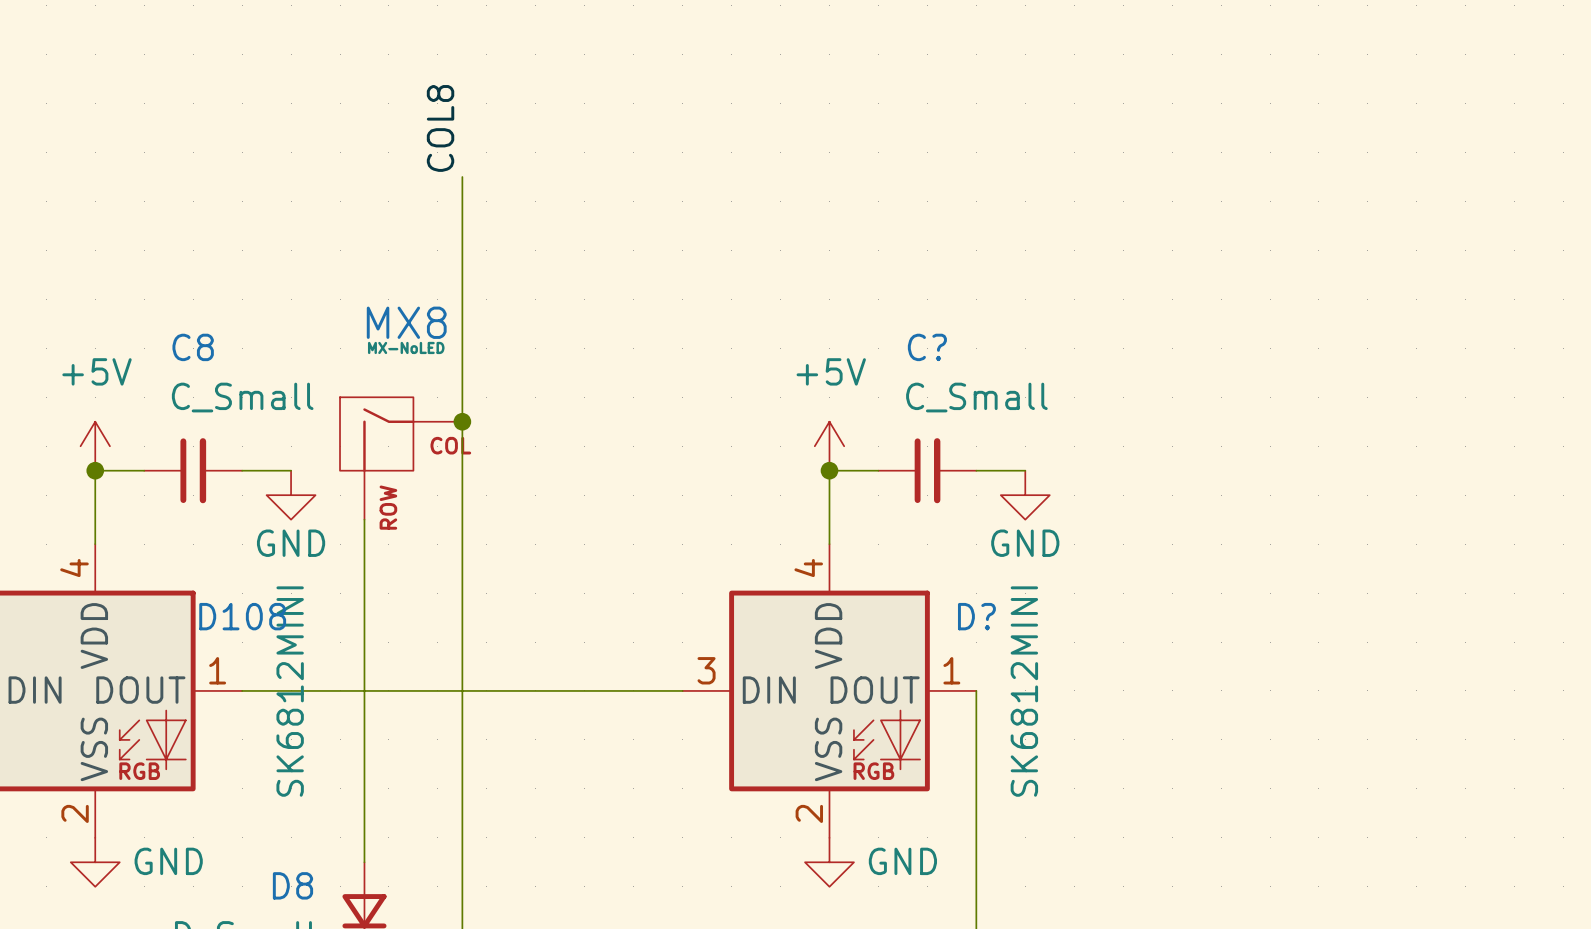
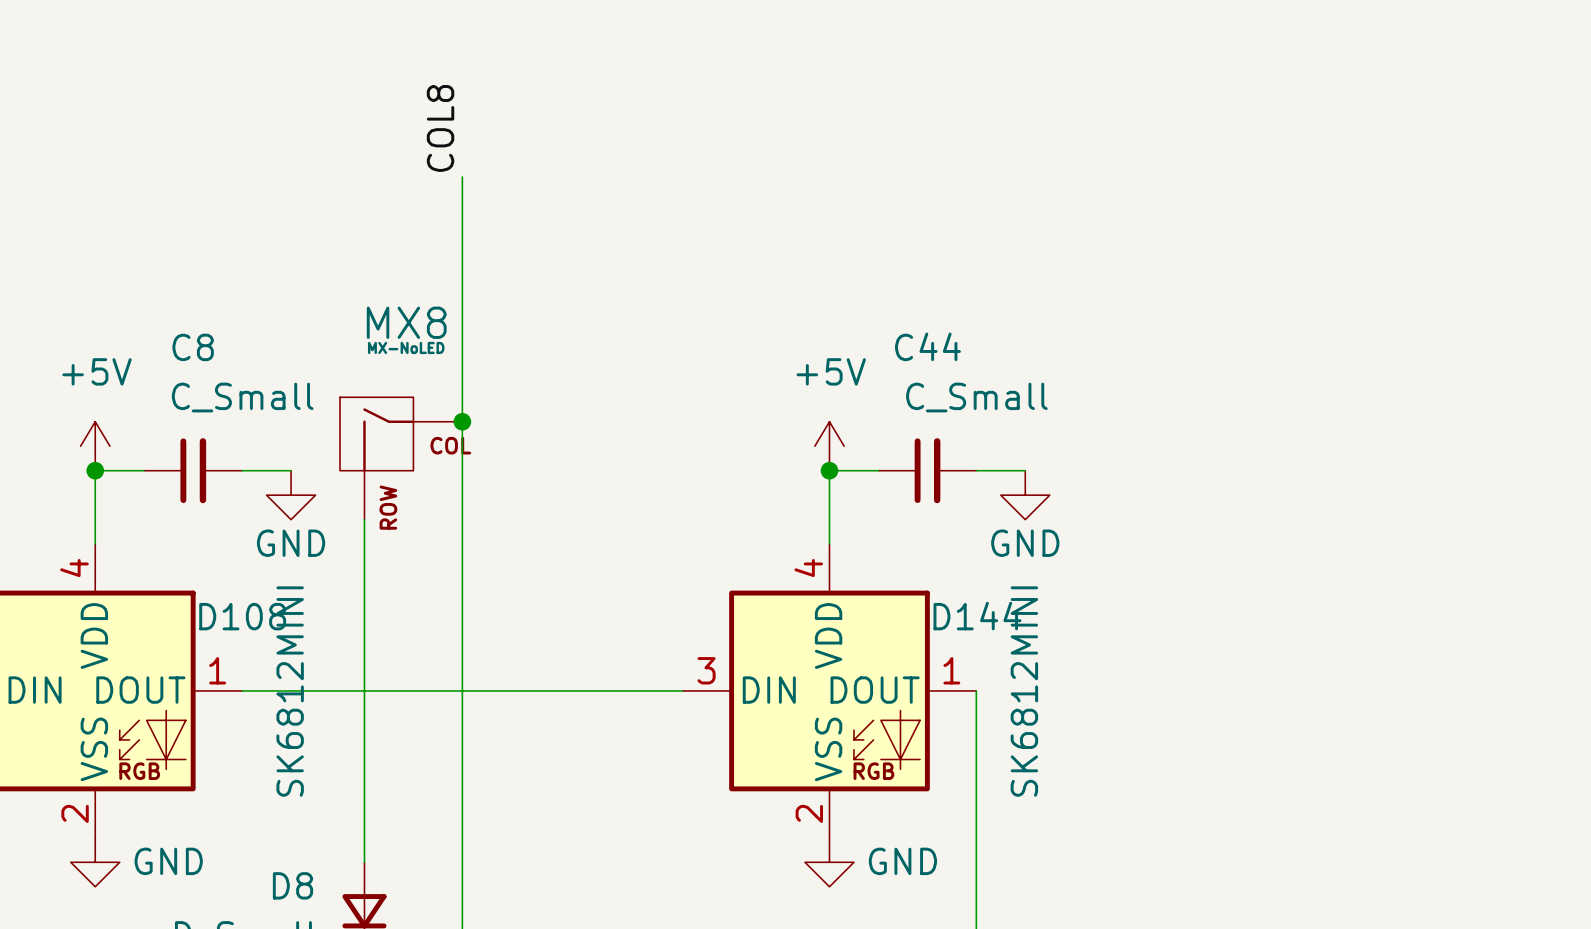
C? name: C? (927, 347) -> C44 (927, 346)
D? name: D? (976, 616) -> D144 (977, 616)

